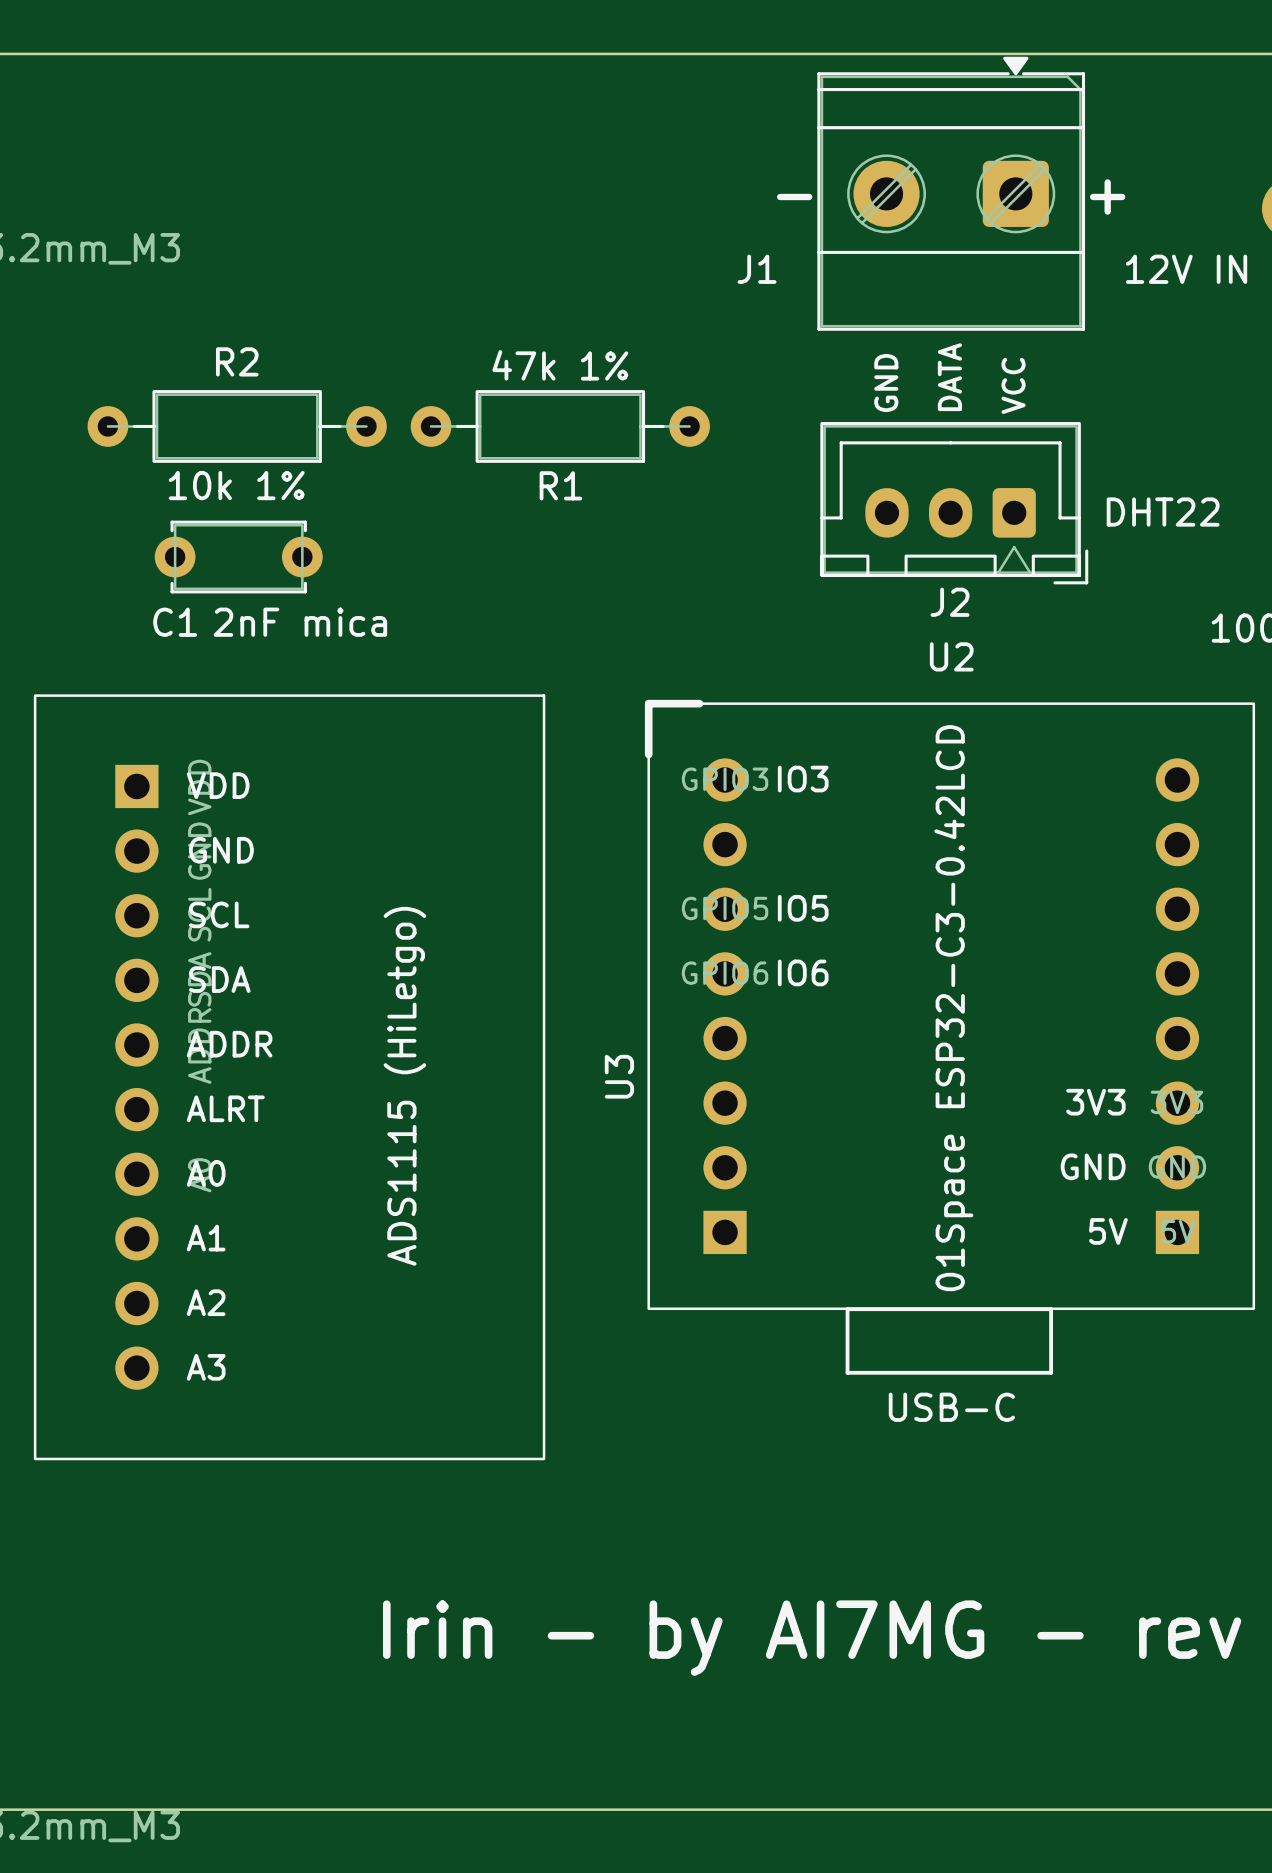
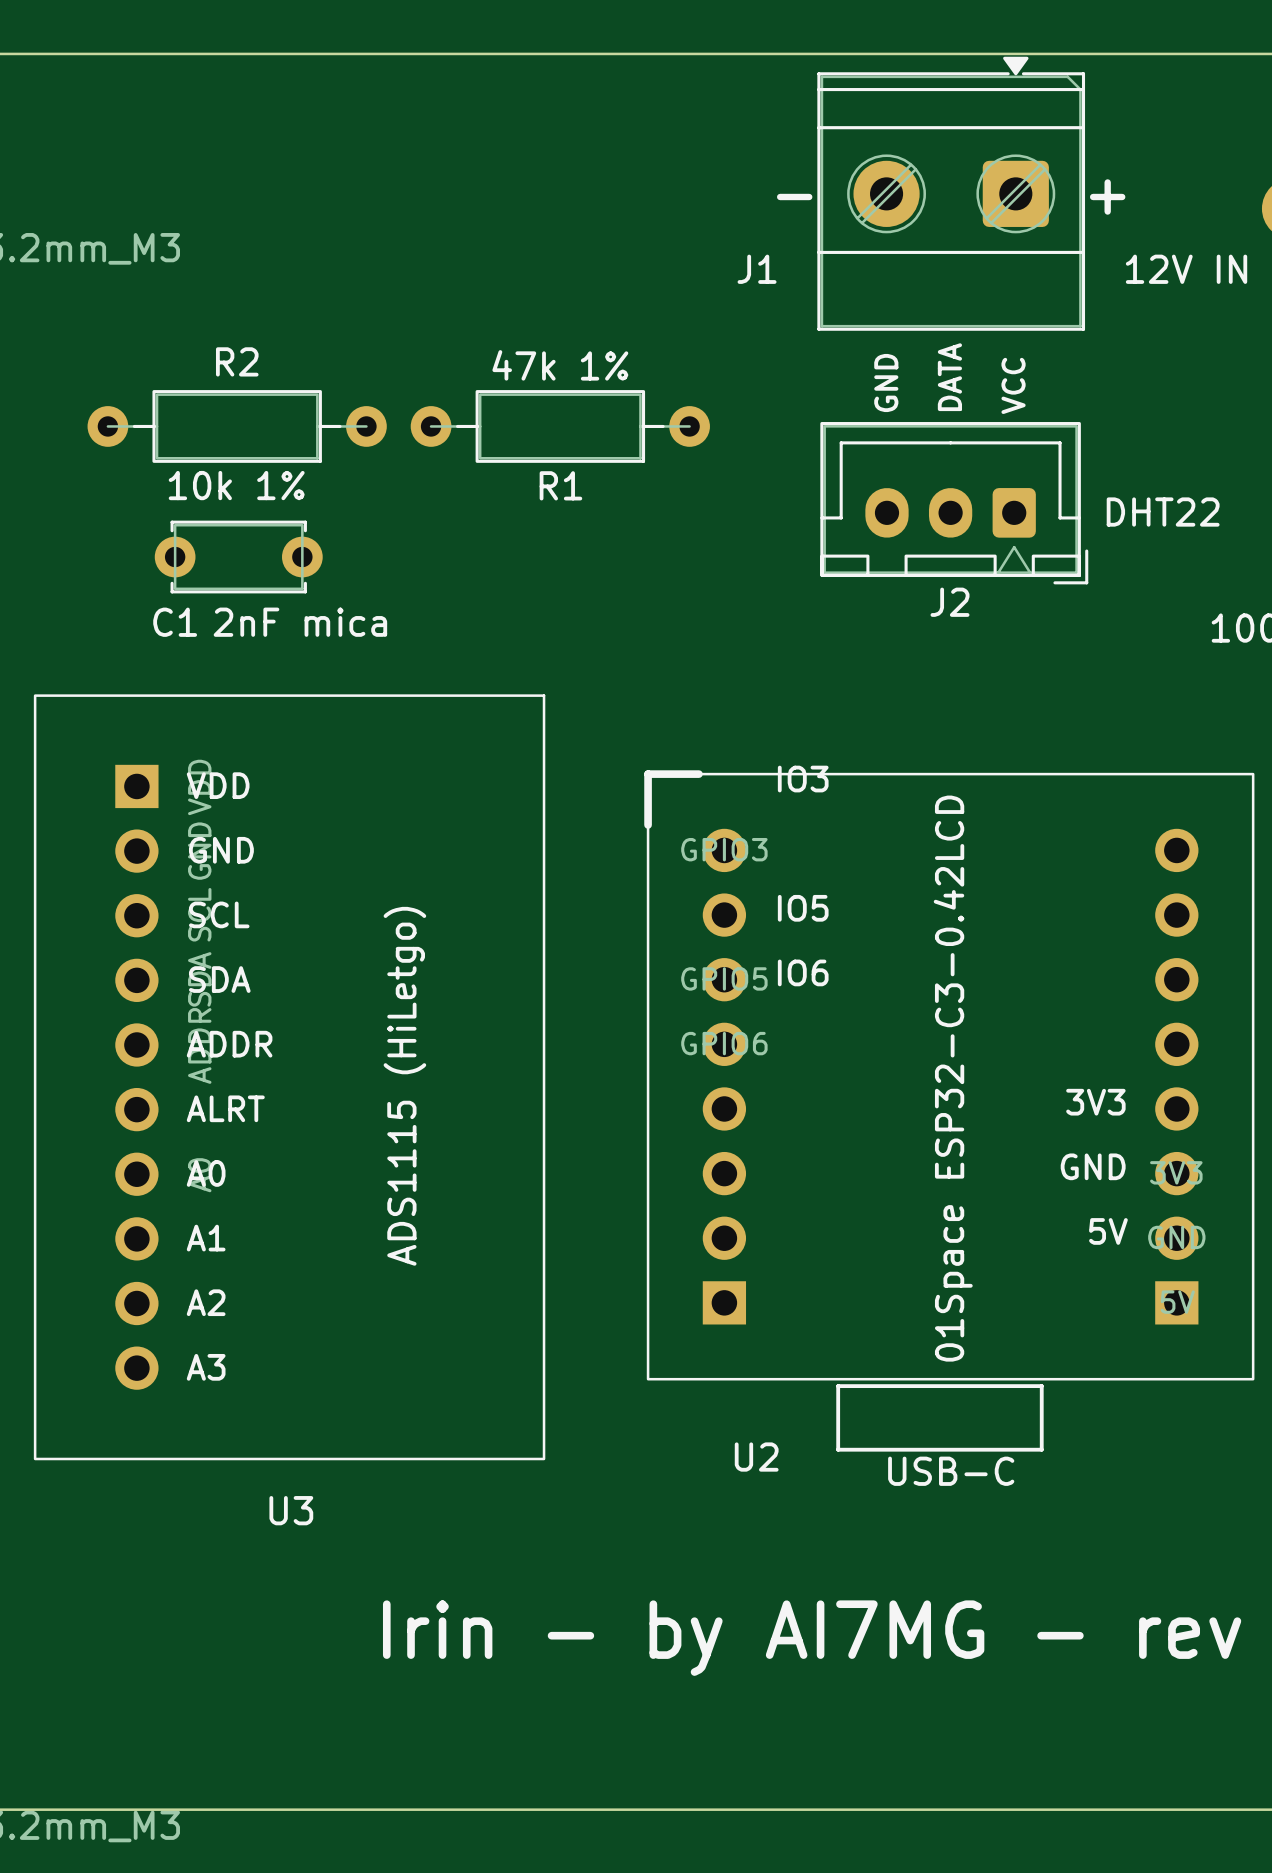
U2 name position: U2 (951, 656) -> U2 (756, 1457)
U2 position: (949, 1004) -> (949, 1075)
U3 name rotation: 0° (619, 1076) -> 90° clockwise (291, 1510)
U3 name position: U3 (619, 1076) -> U3 (291, 1510)
line: (847, 1309) (1051, 1309) (1051, 1372) (847, 1372) (847, 1309) -> (838, 1386) (1041, 1386) (1041, 1449) (838, 1449) (838, 1386)
text position: USB-C (951, 1407) -> USB-C (951, 1471)

